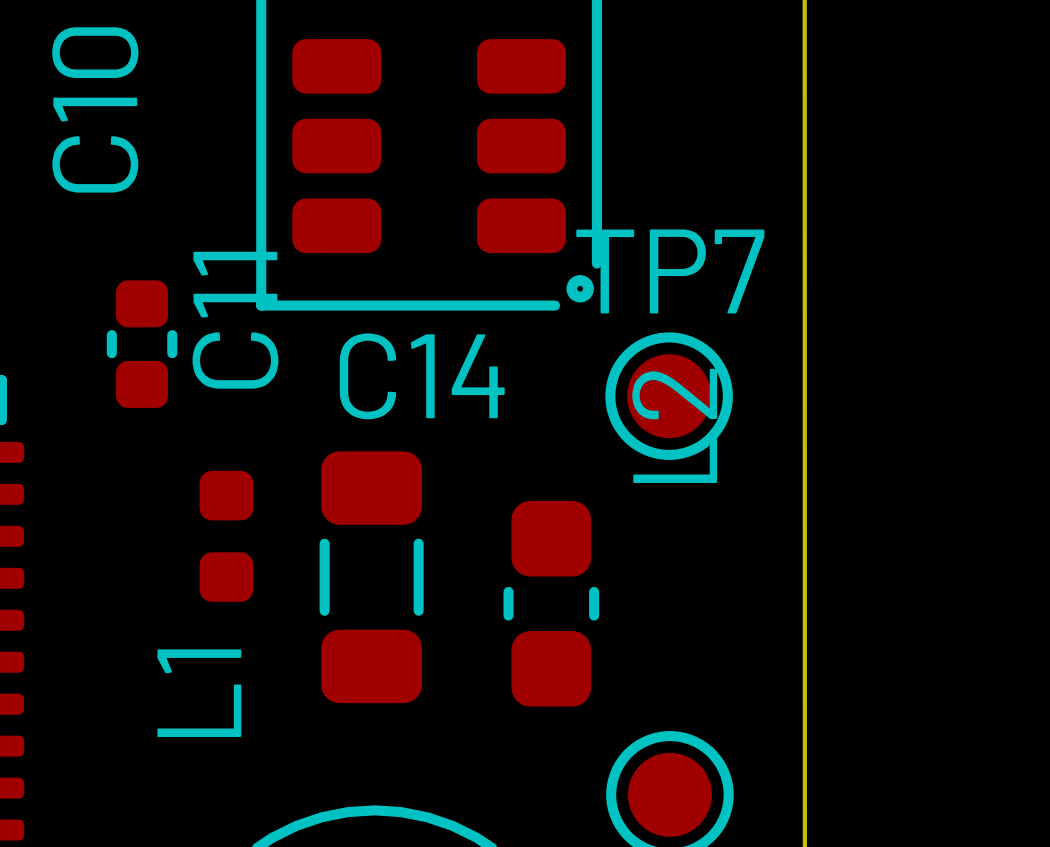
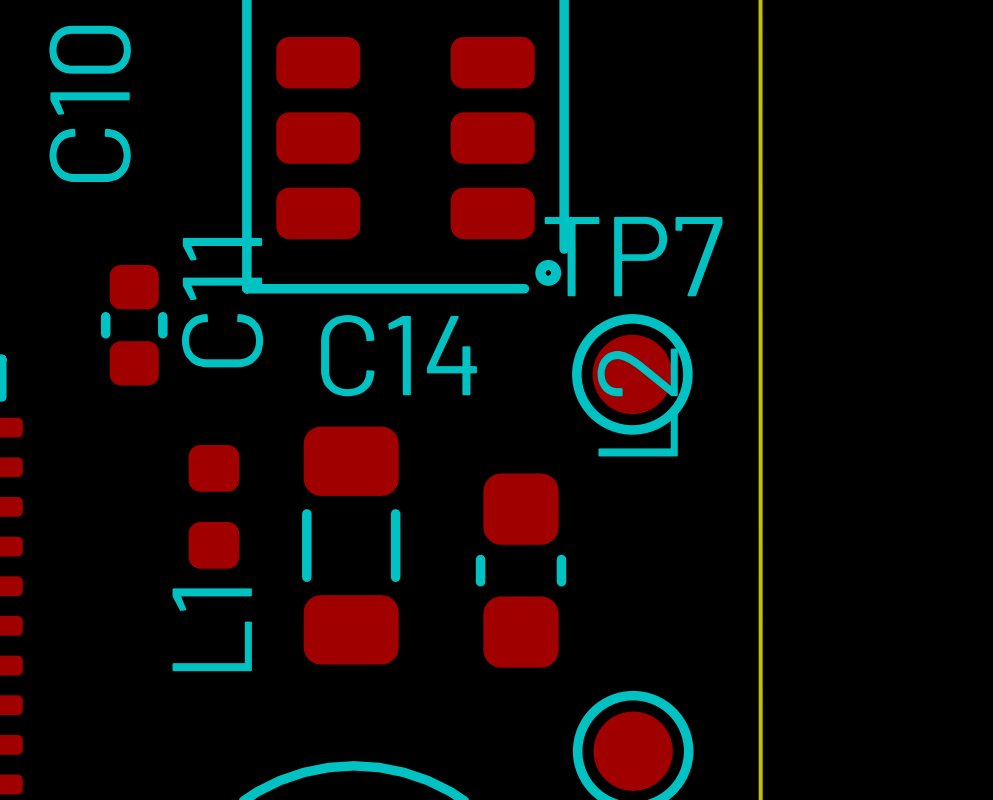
L1 name position: L1 (199, 693) -> L1 (212, 629)

